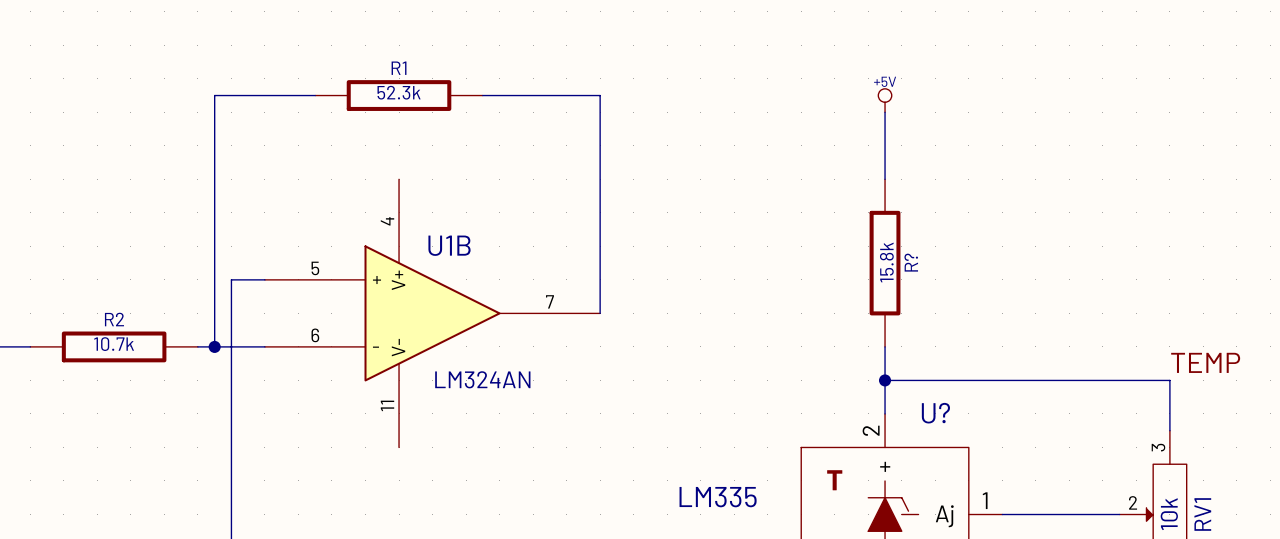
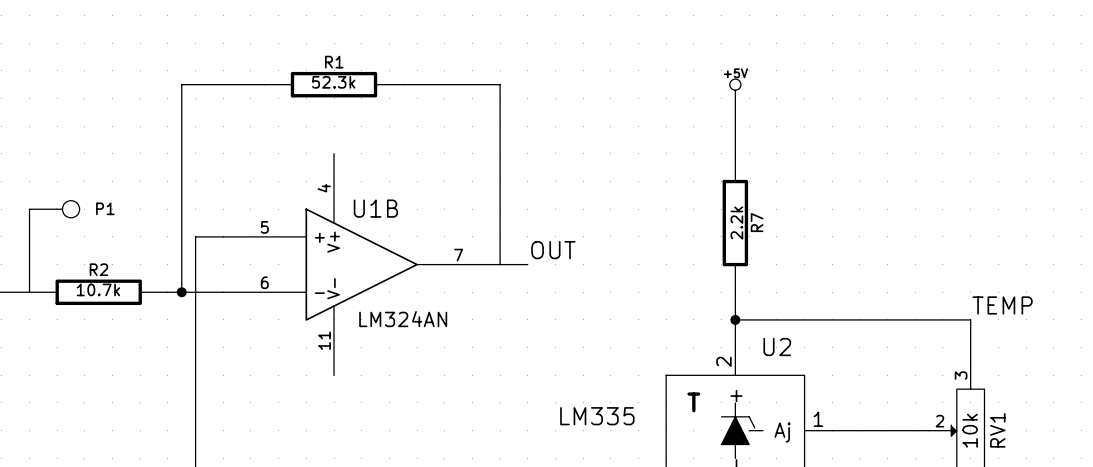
wire: none -> (29, 209) (29, 292)
P1: none -> (54, 209)
R? value: 15.8k (886, 262) -> 2.2k (736, 223)
R? name: R? (911, 262) -> R7 (757, 222)
label: none -> OUT (553, 250)
wire: none -> (500, 264) (527, 264)
U? name: U? (935, 413) -> U2 (777, 347)

